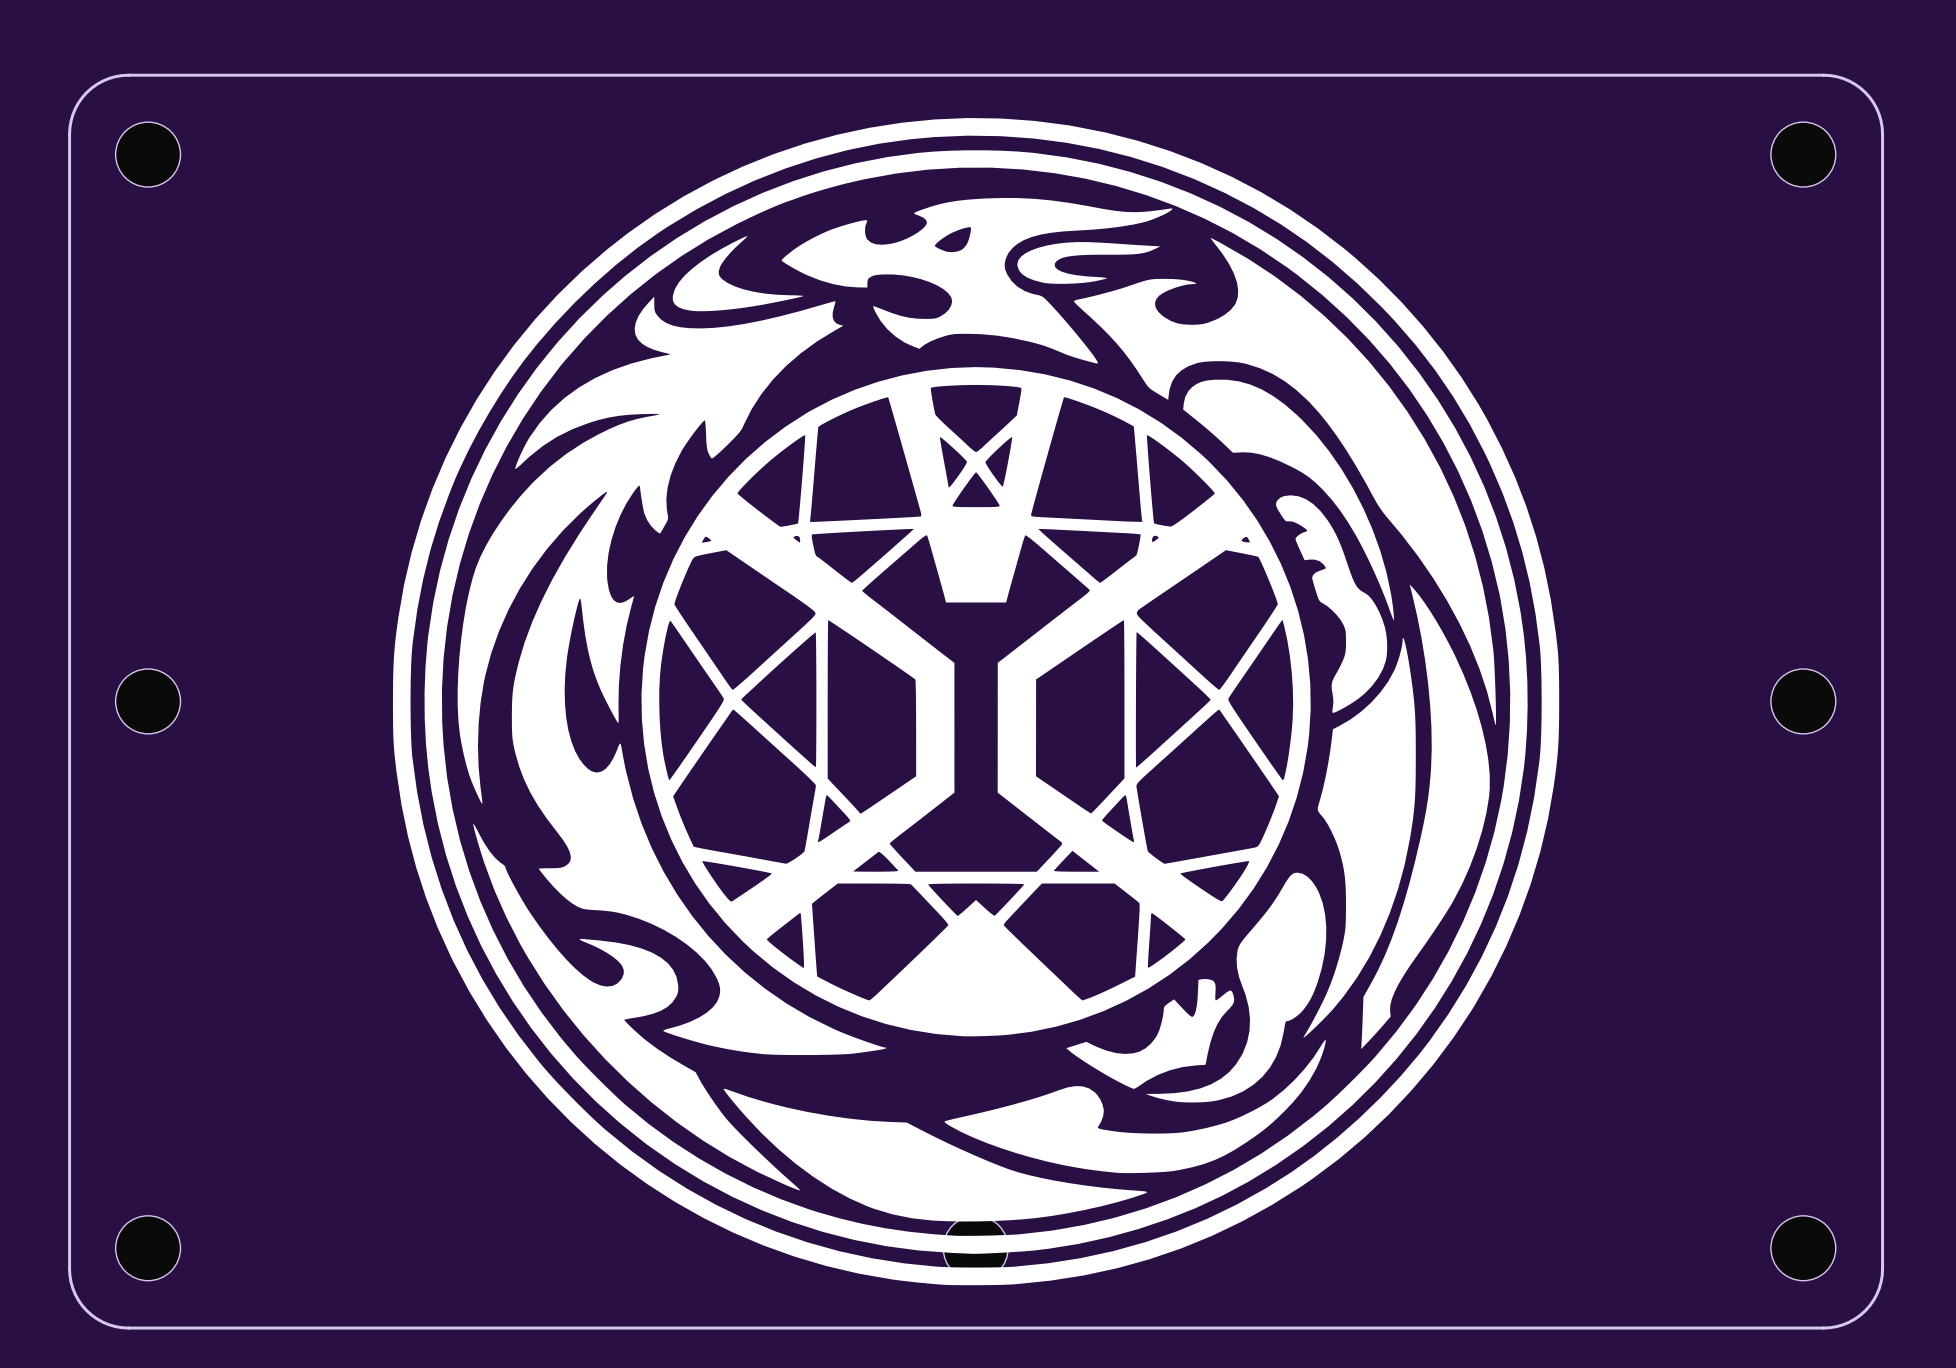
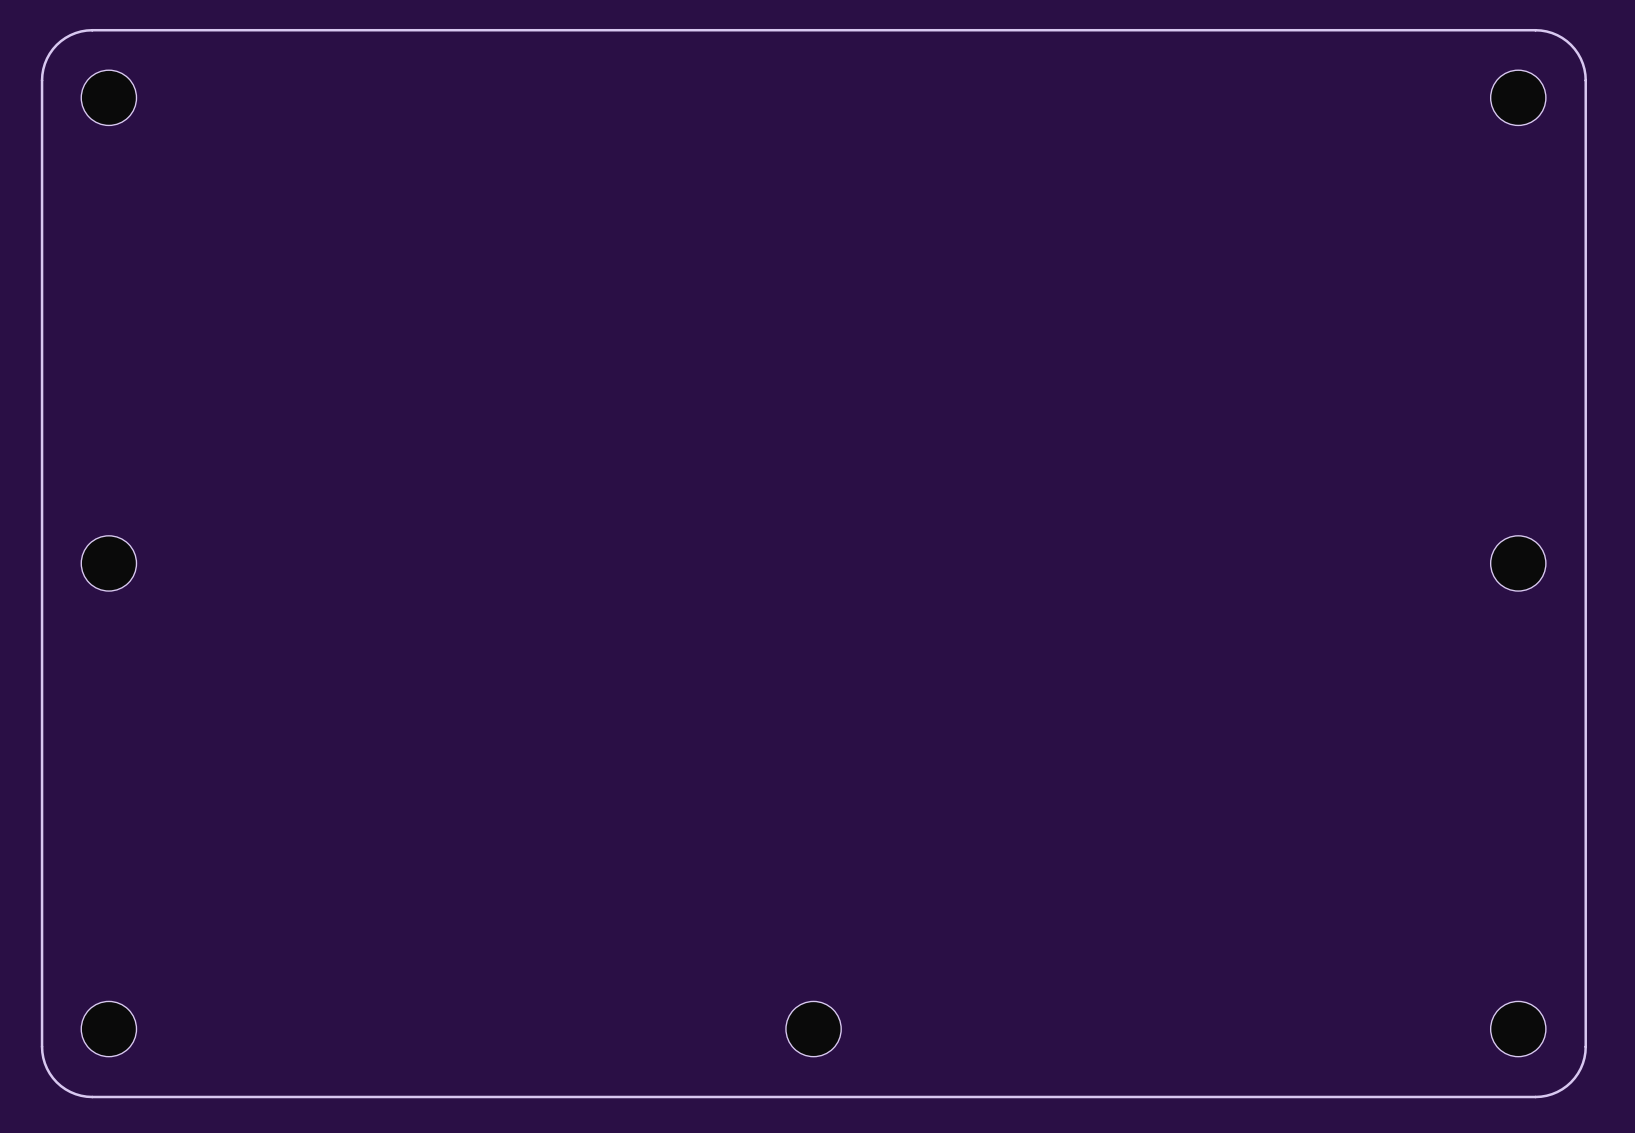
drawing: [392, 118, 1560, 1286] -> none

